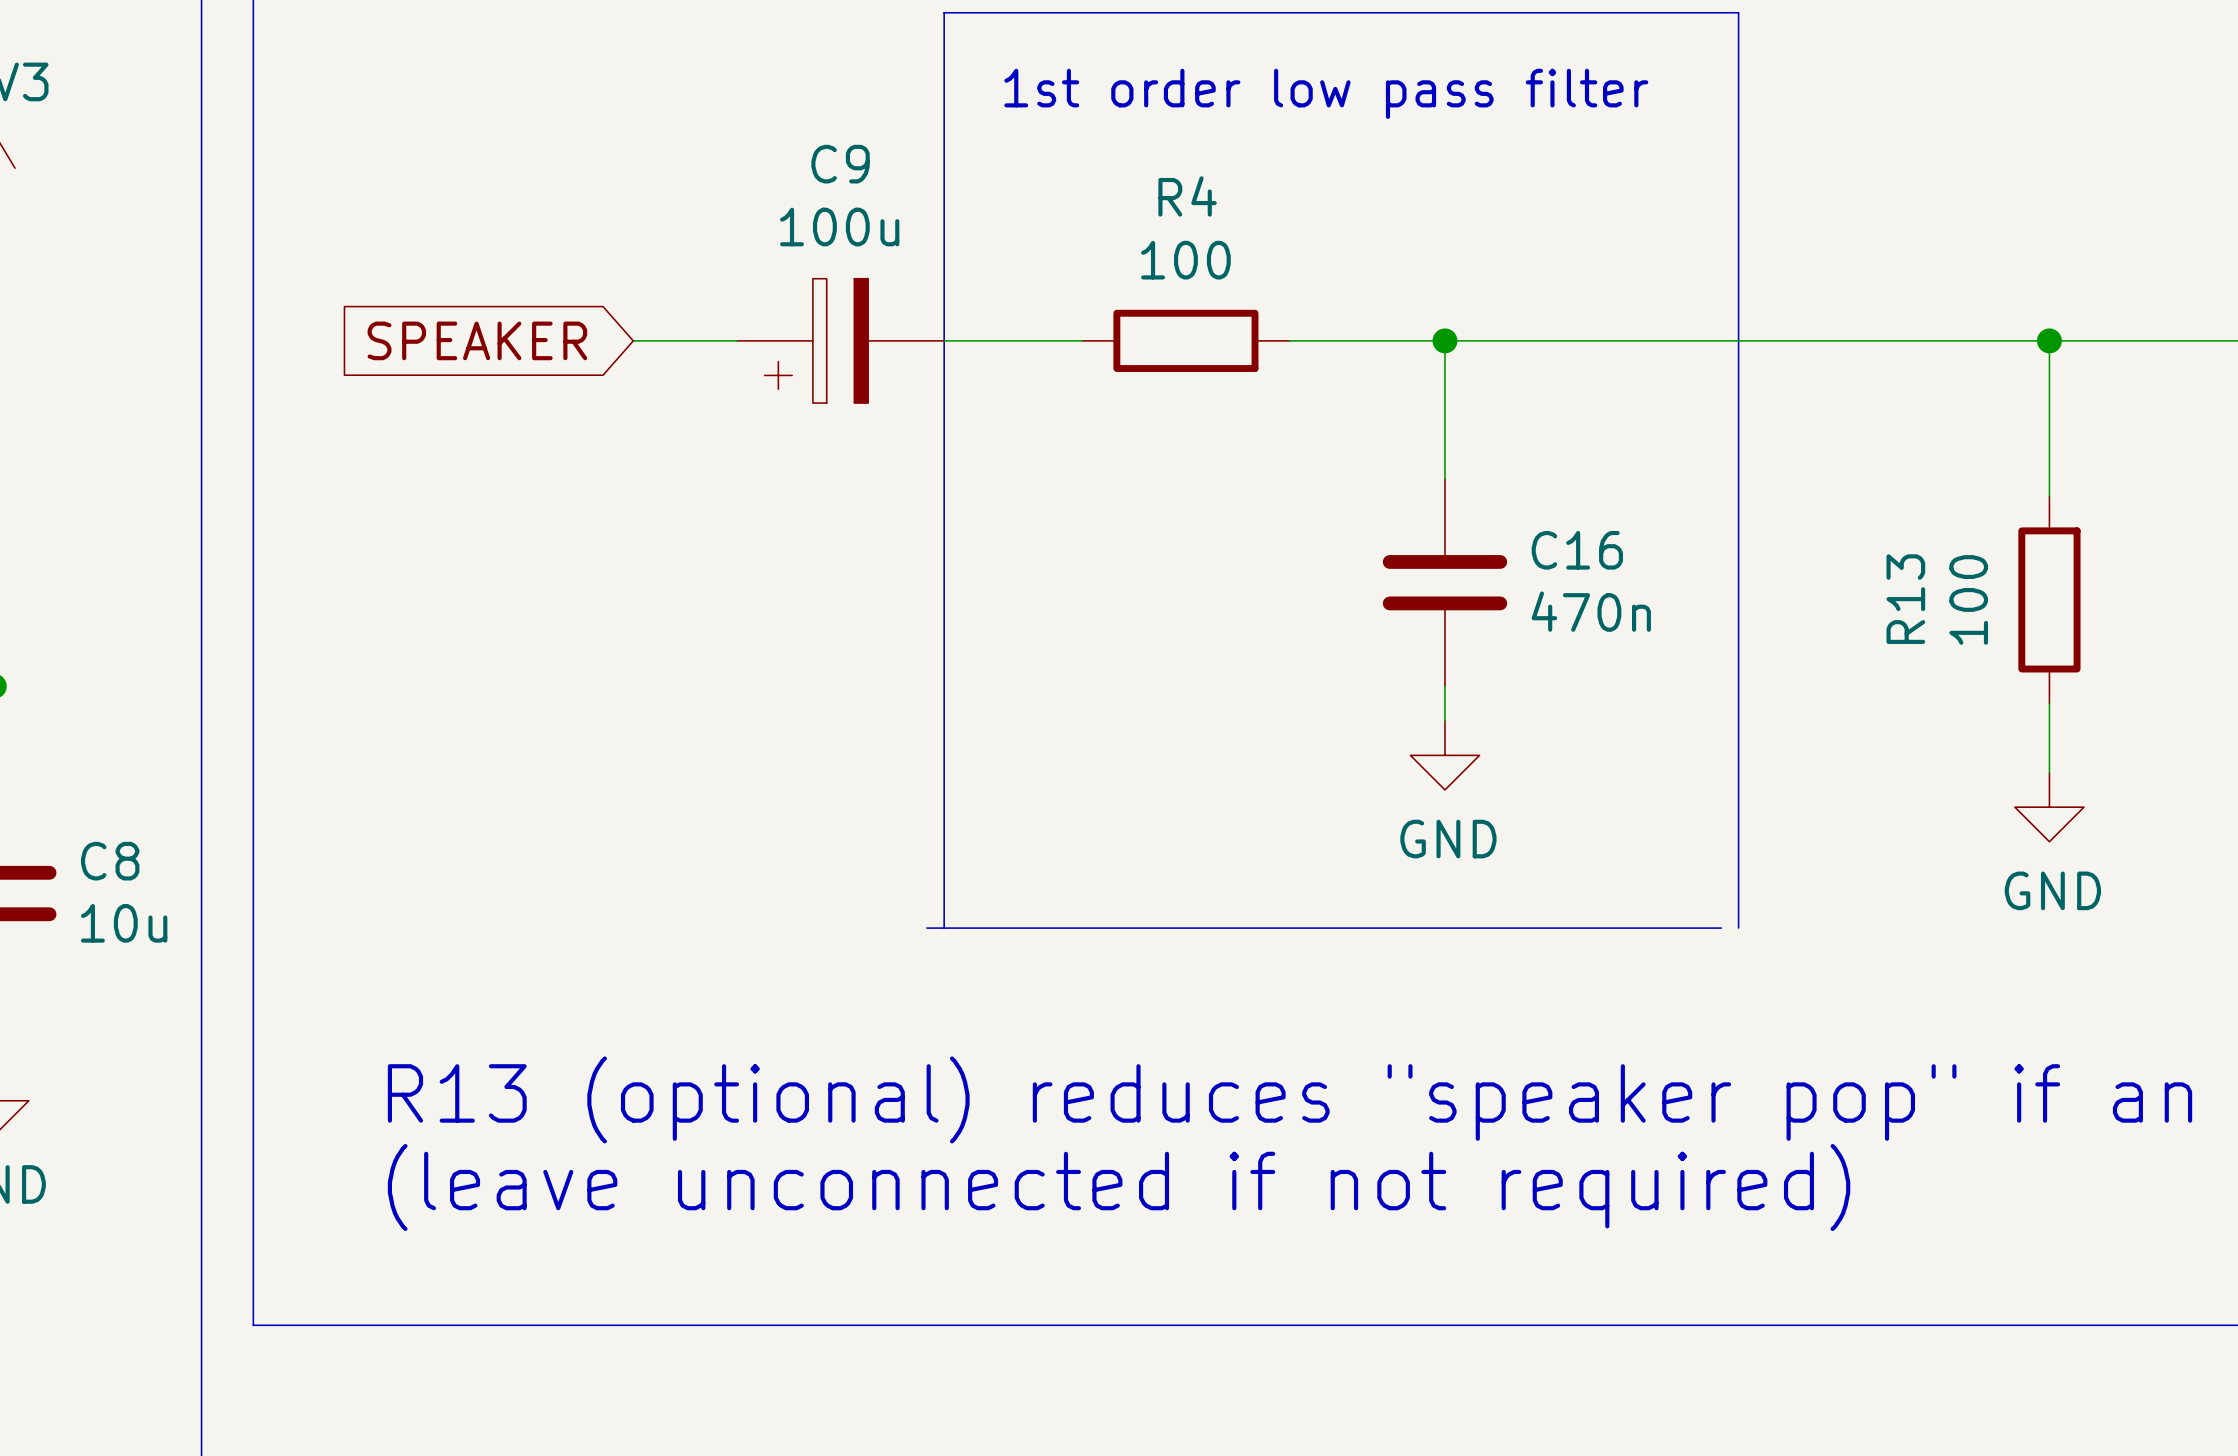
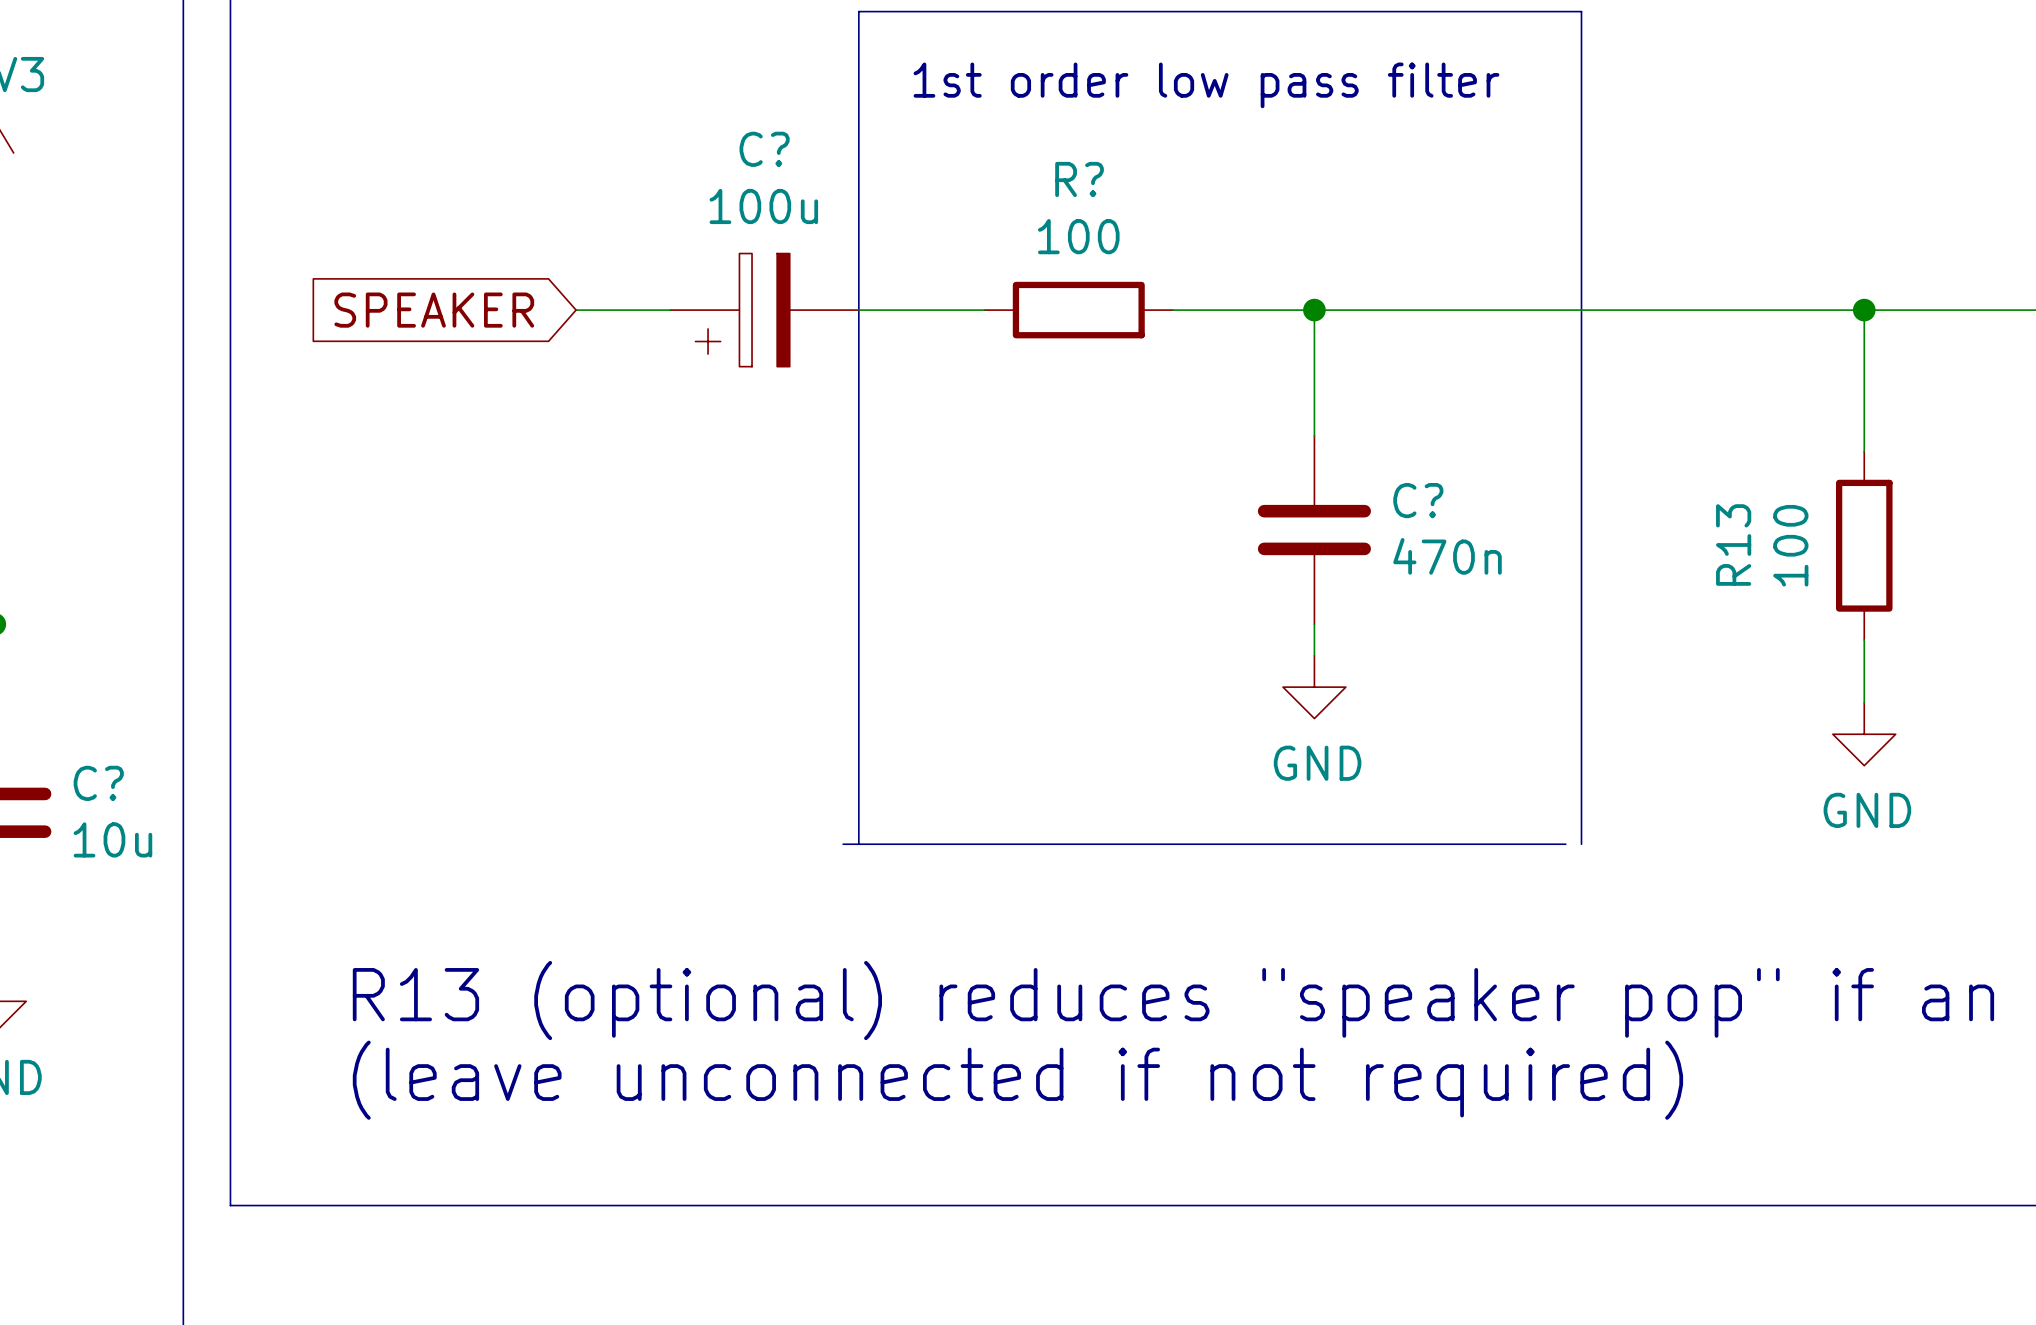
C9 name: C9 (840, 164) -> C? (764, 149)
R4 name: R4 (1187, 196) -> R? (1079, 179)
C16 name: C16 (1577, 550) -> C? (1418, 500)
C8 name: C8 (110, 861) -> C? (98, 783)

